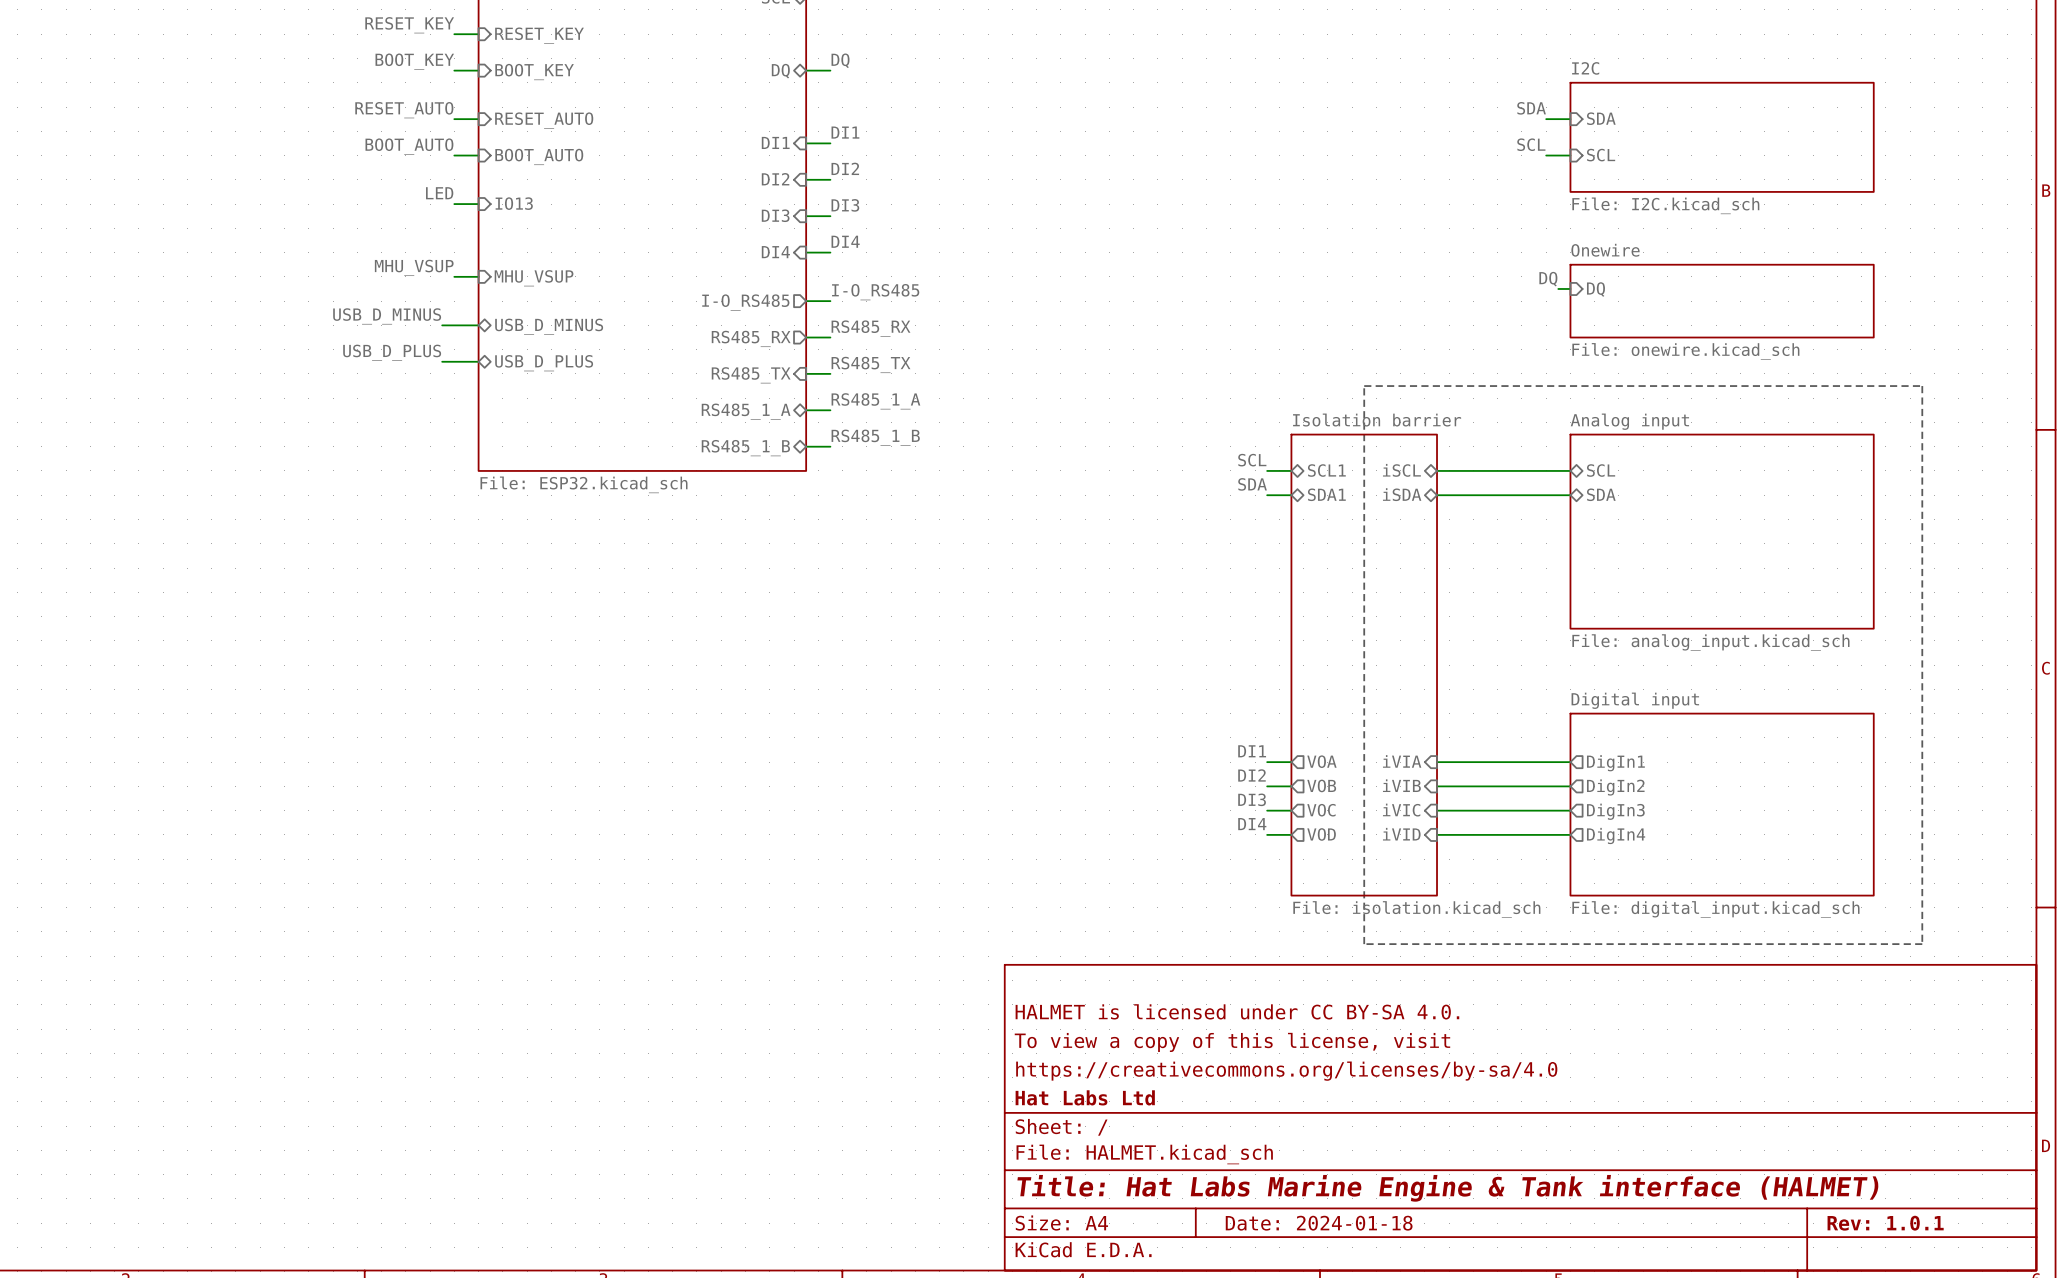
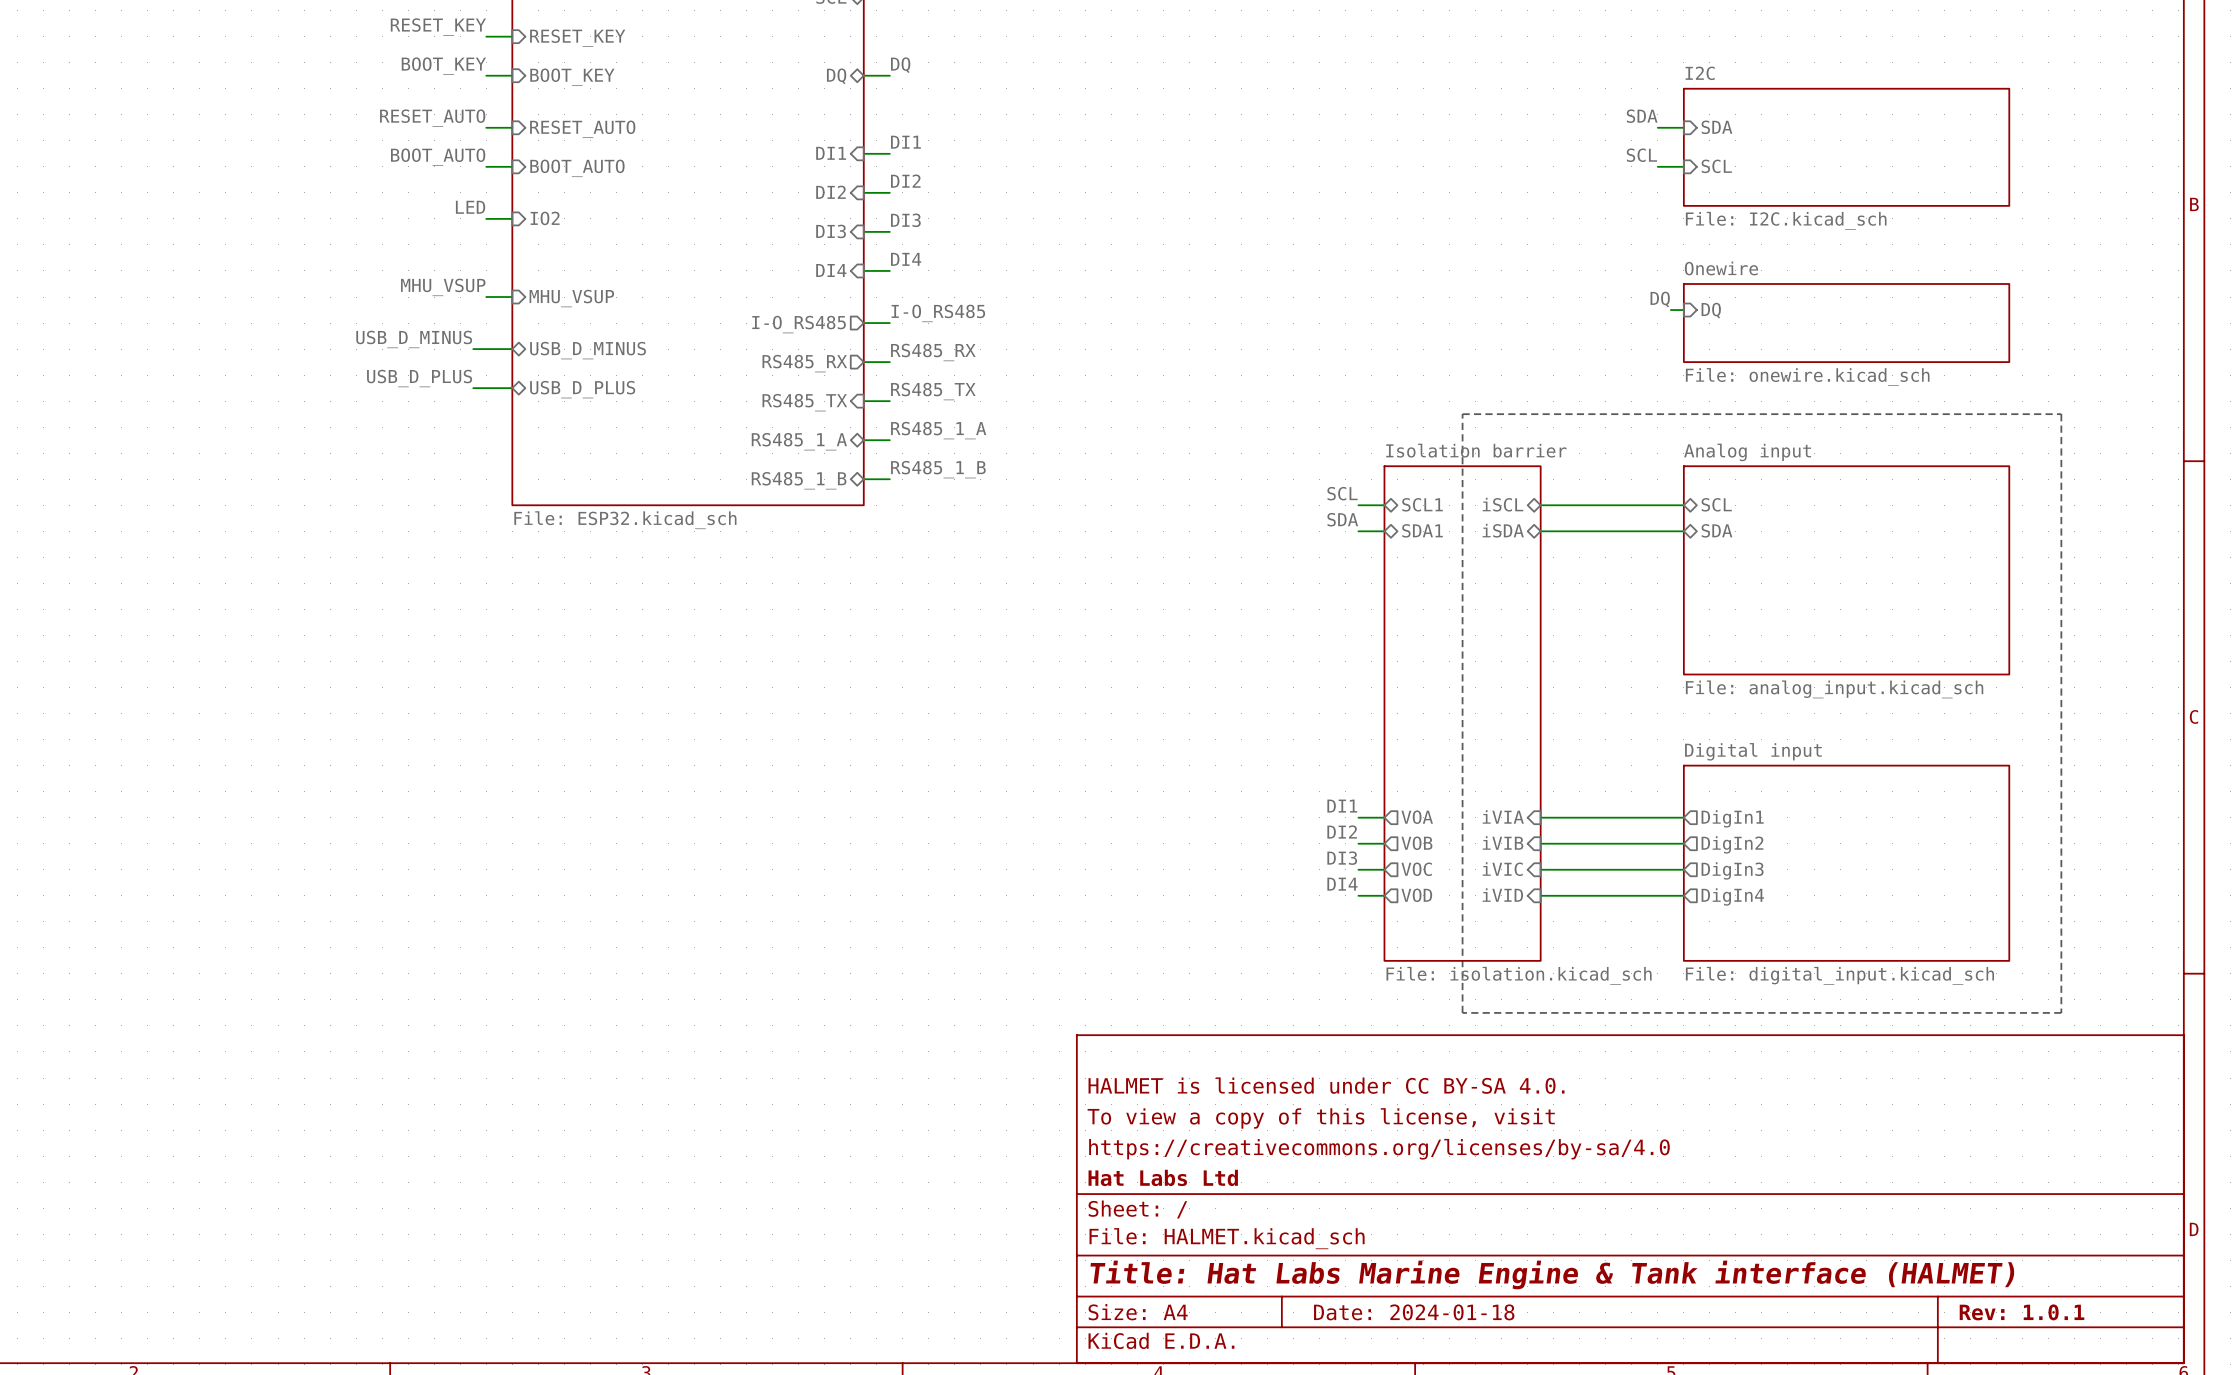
sheet pin: IO13 (514, 203) -> IO2 (545, 218)

